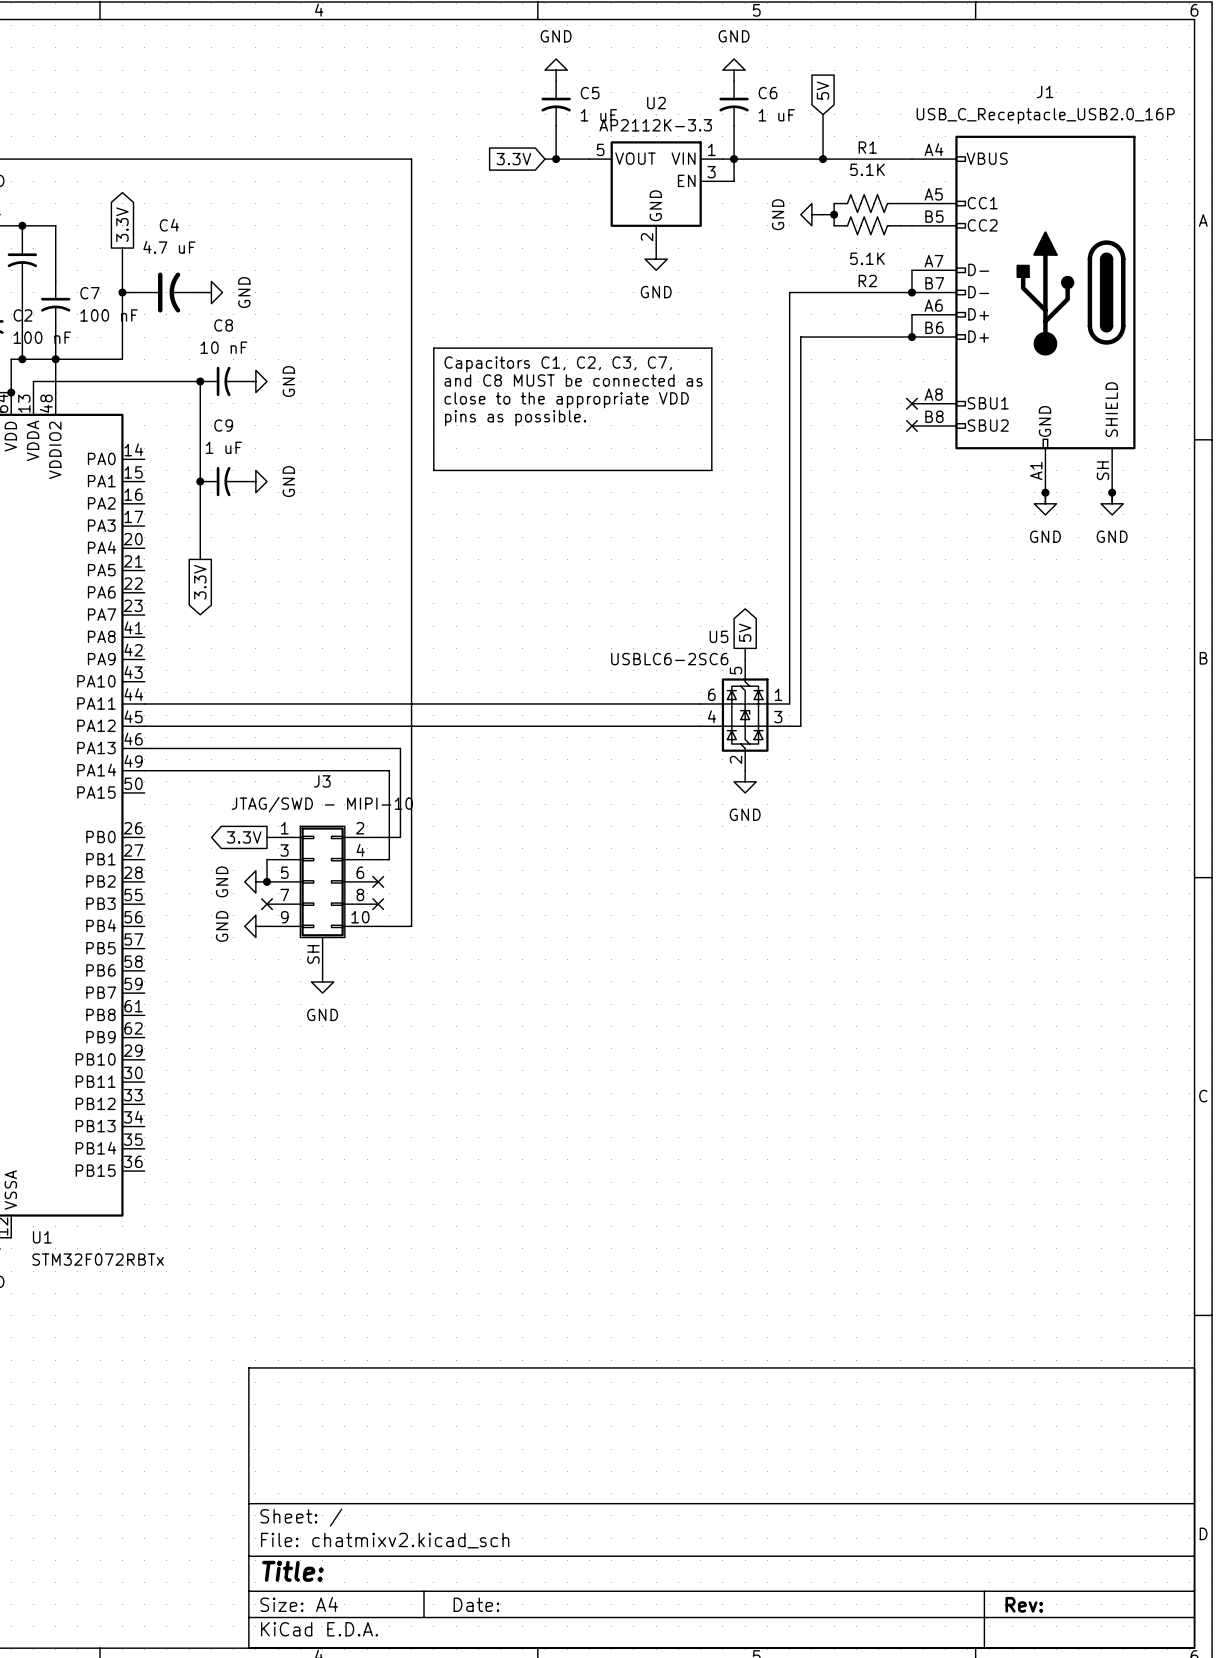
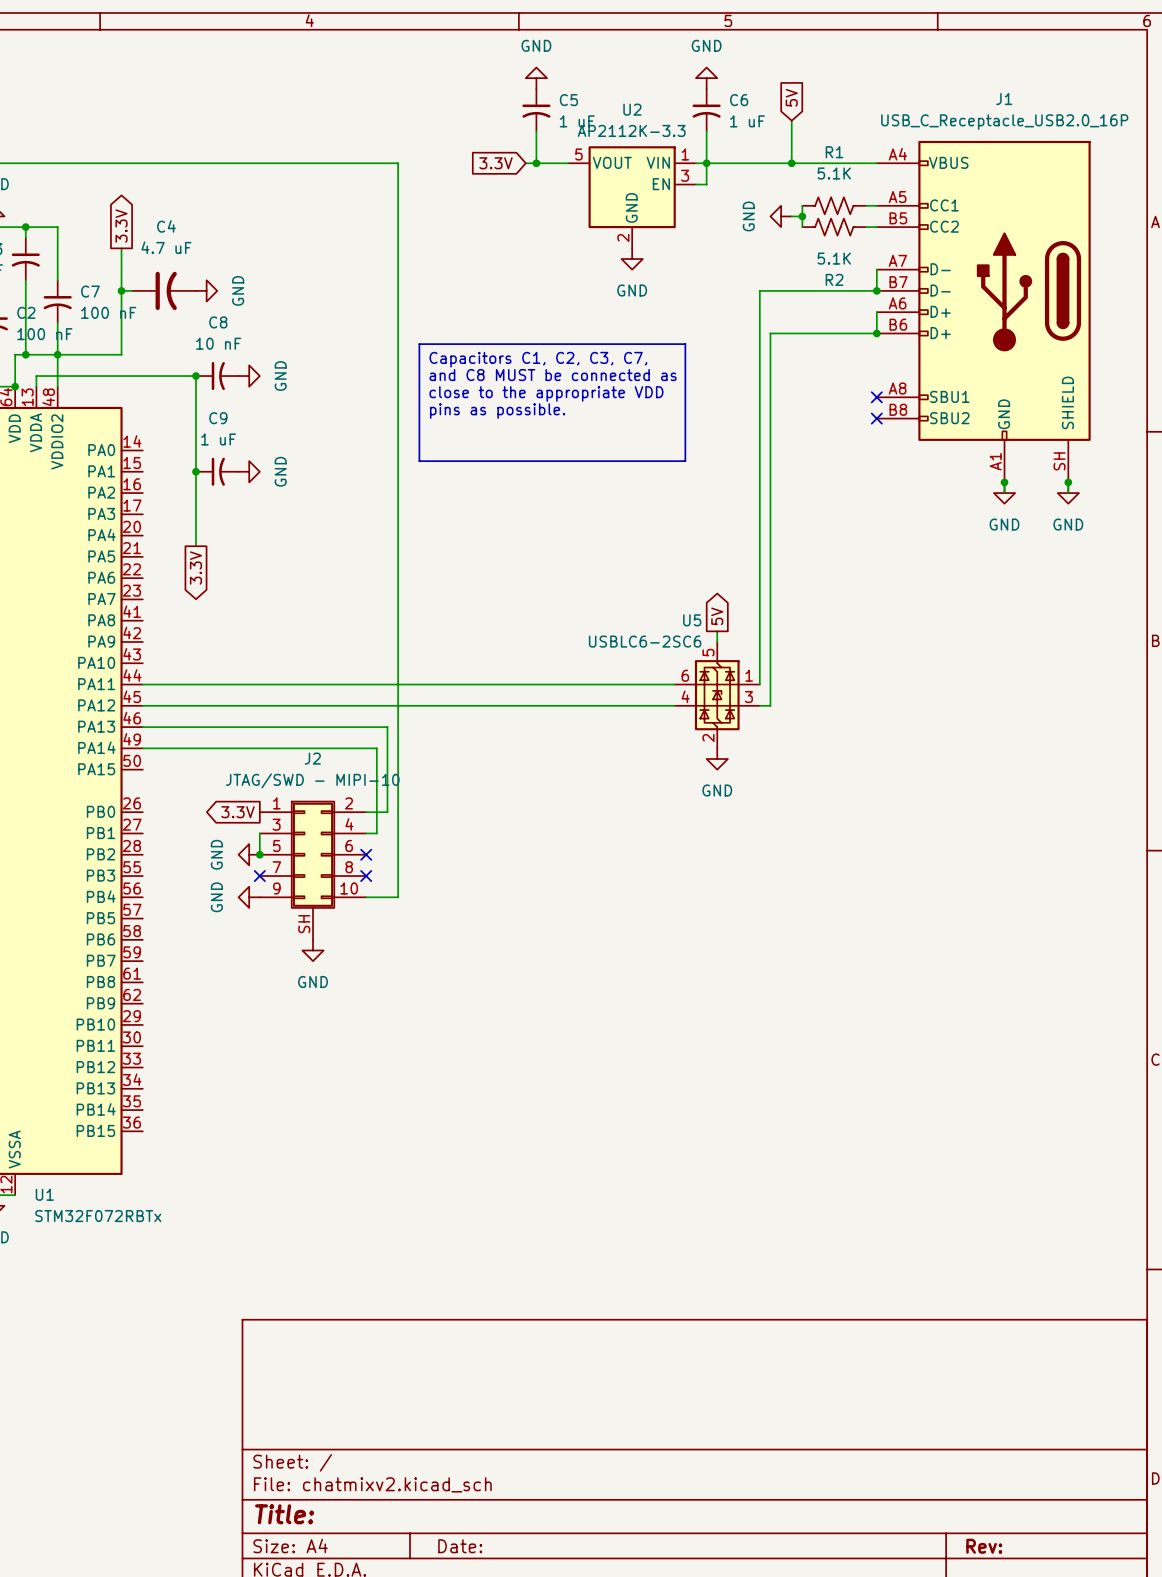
J3 name: J3 (322, 781) -> J2 (312, 758)

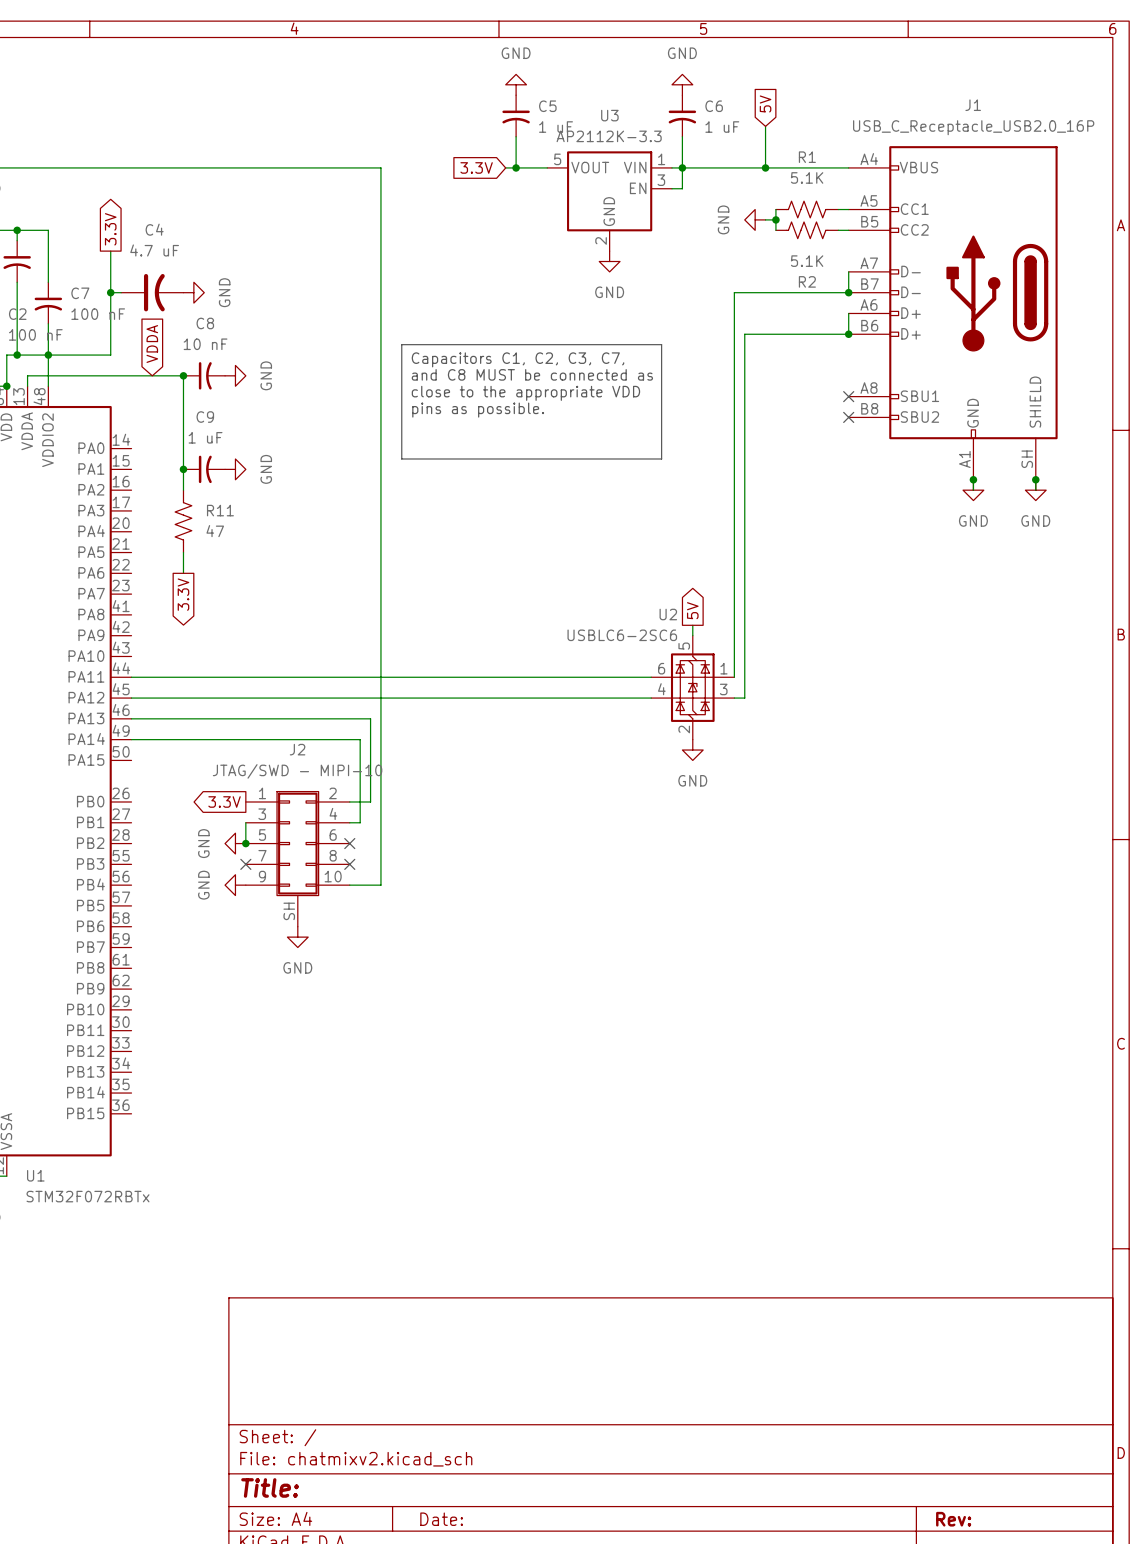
U2 name: U2 (632, 109) -> U3 (609, 115)
global label: none -> VDDA (152, 344)
wire: (195, 493) (195, 546) -> none
R11: none -> 47 (183, 521)
wire: none -> (183, 552) (183, 573)
global label position: 3.3V (195, 568) -> 3.3V (183, 594)
U5 name: U5 (692, 620) -> U2 (668, 614)

